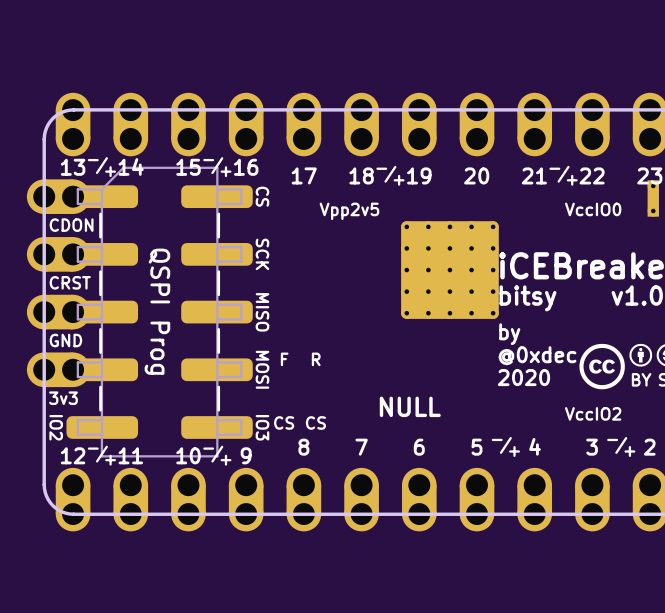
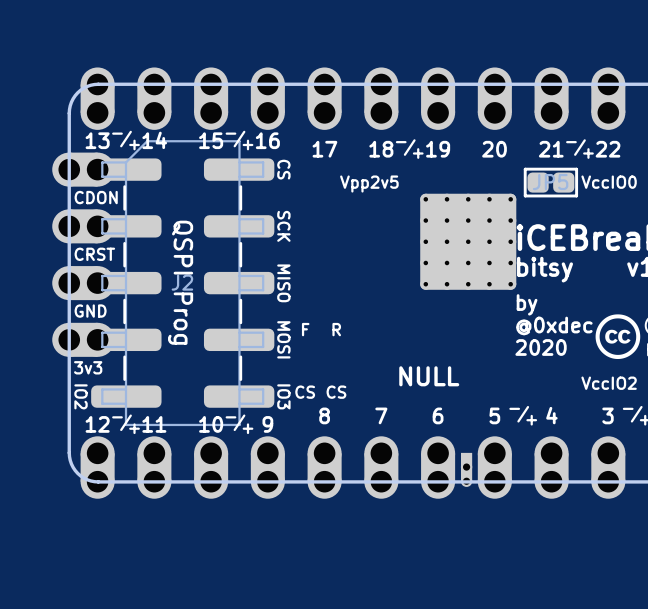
part: none -> (550, 182)
J2 name: none -> J2 (182, 282)
part: none -> (466, 469)

